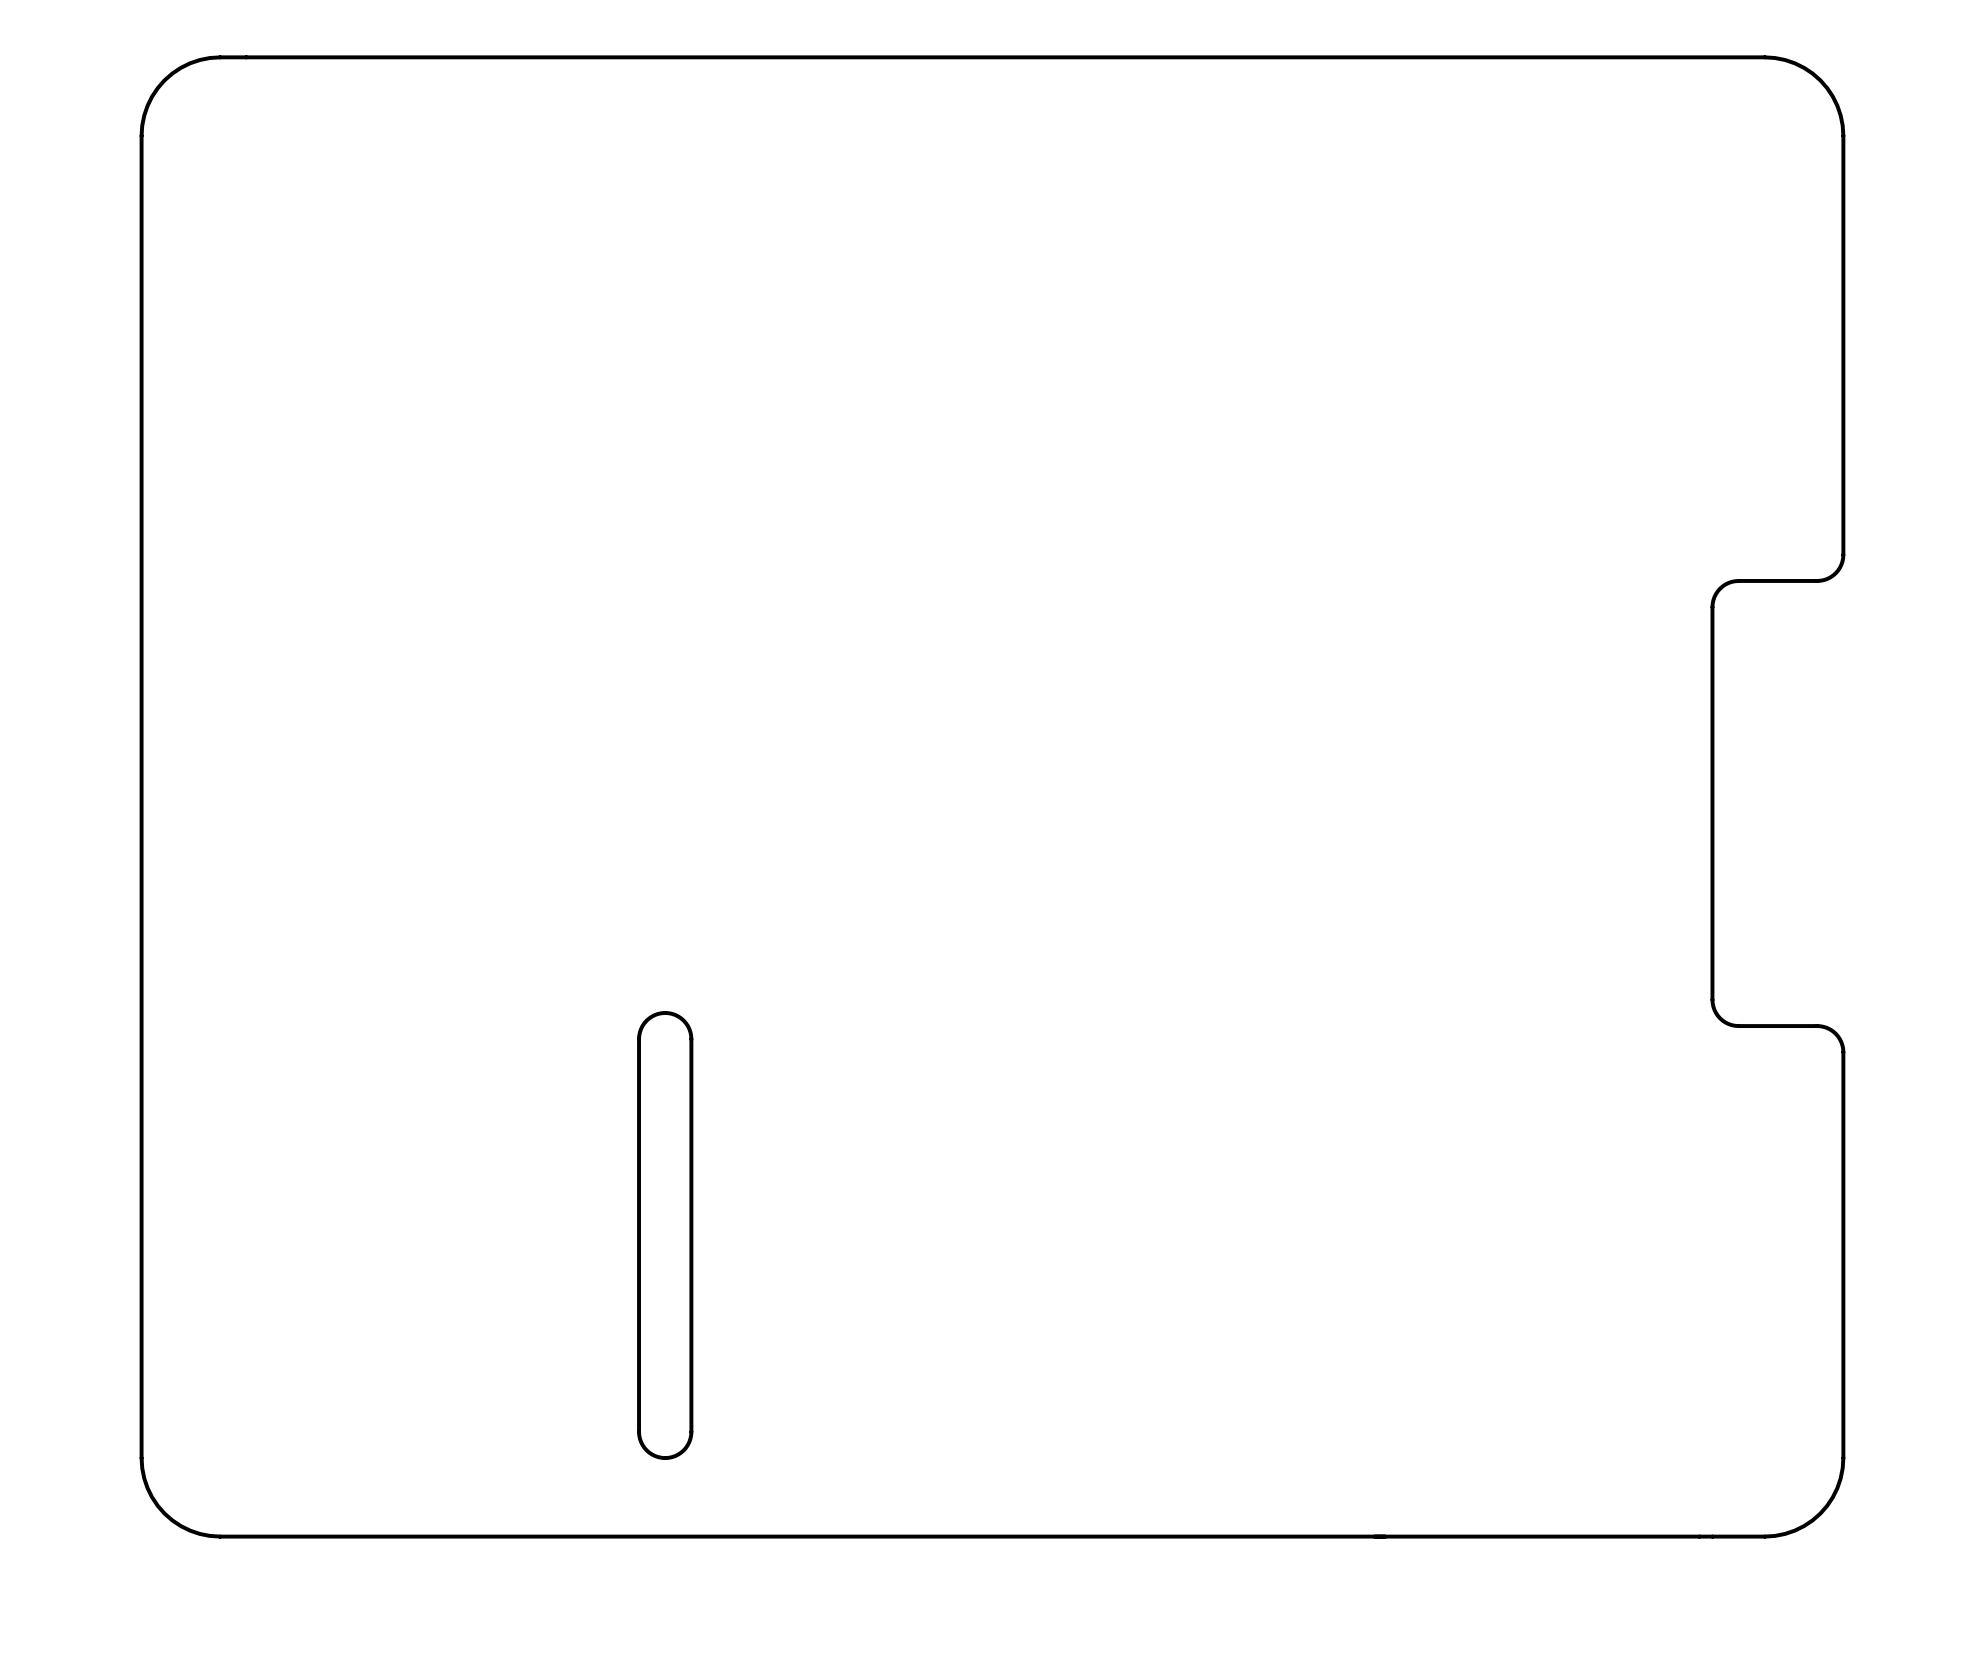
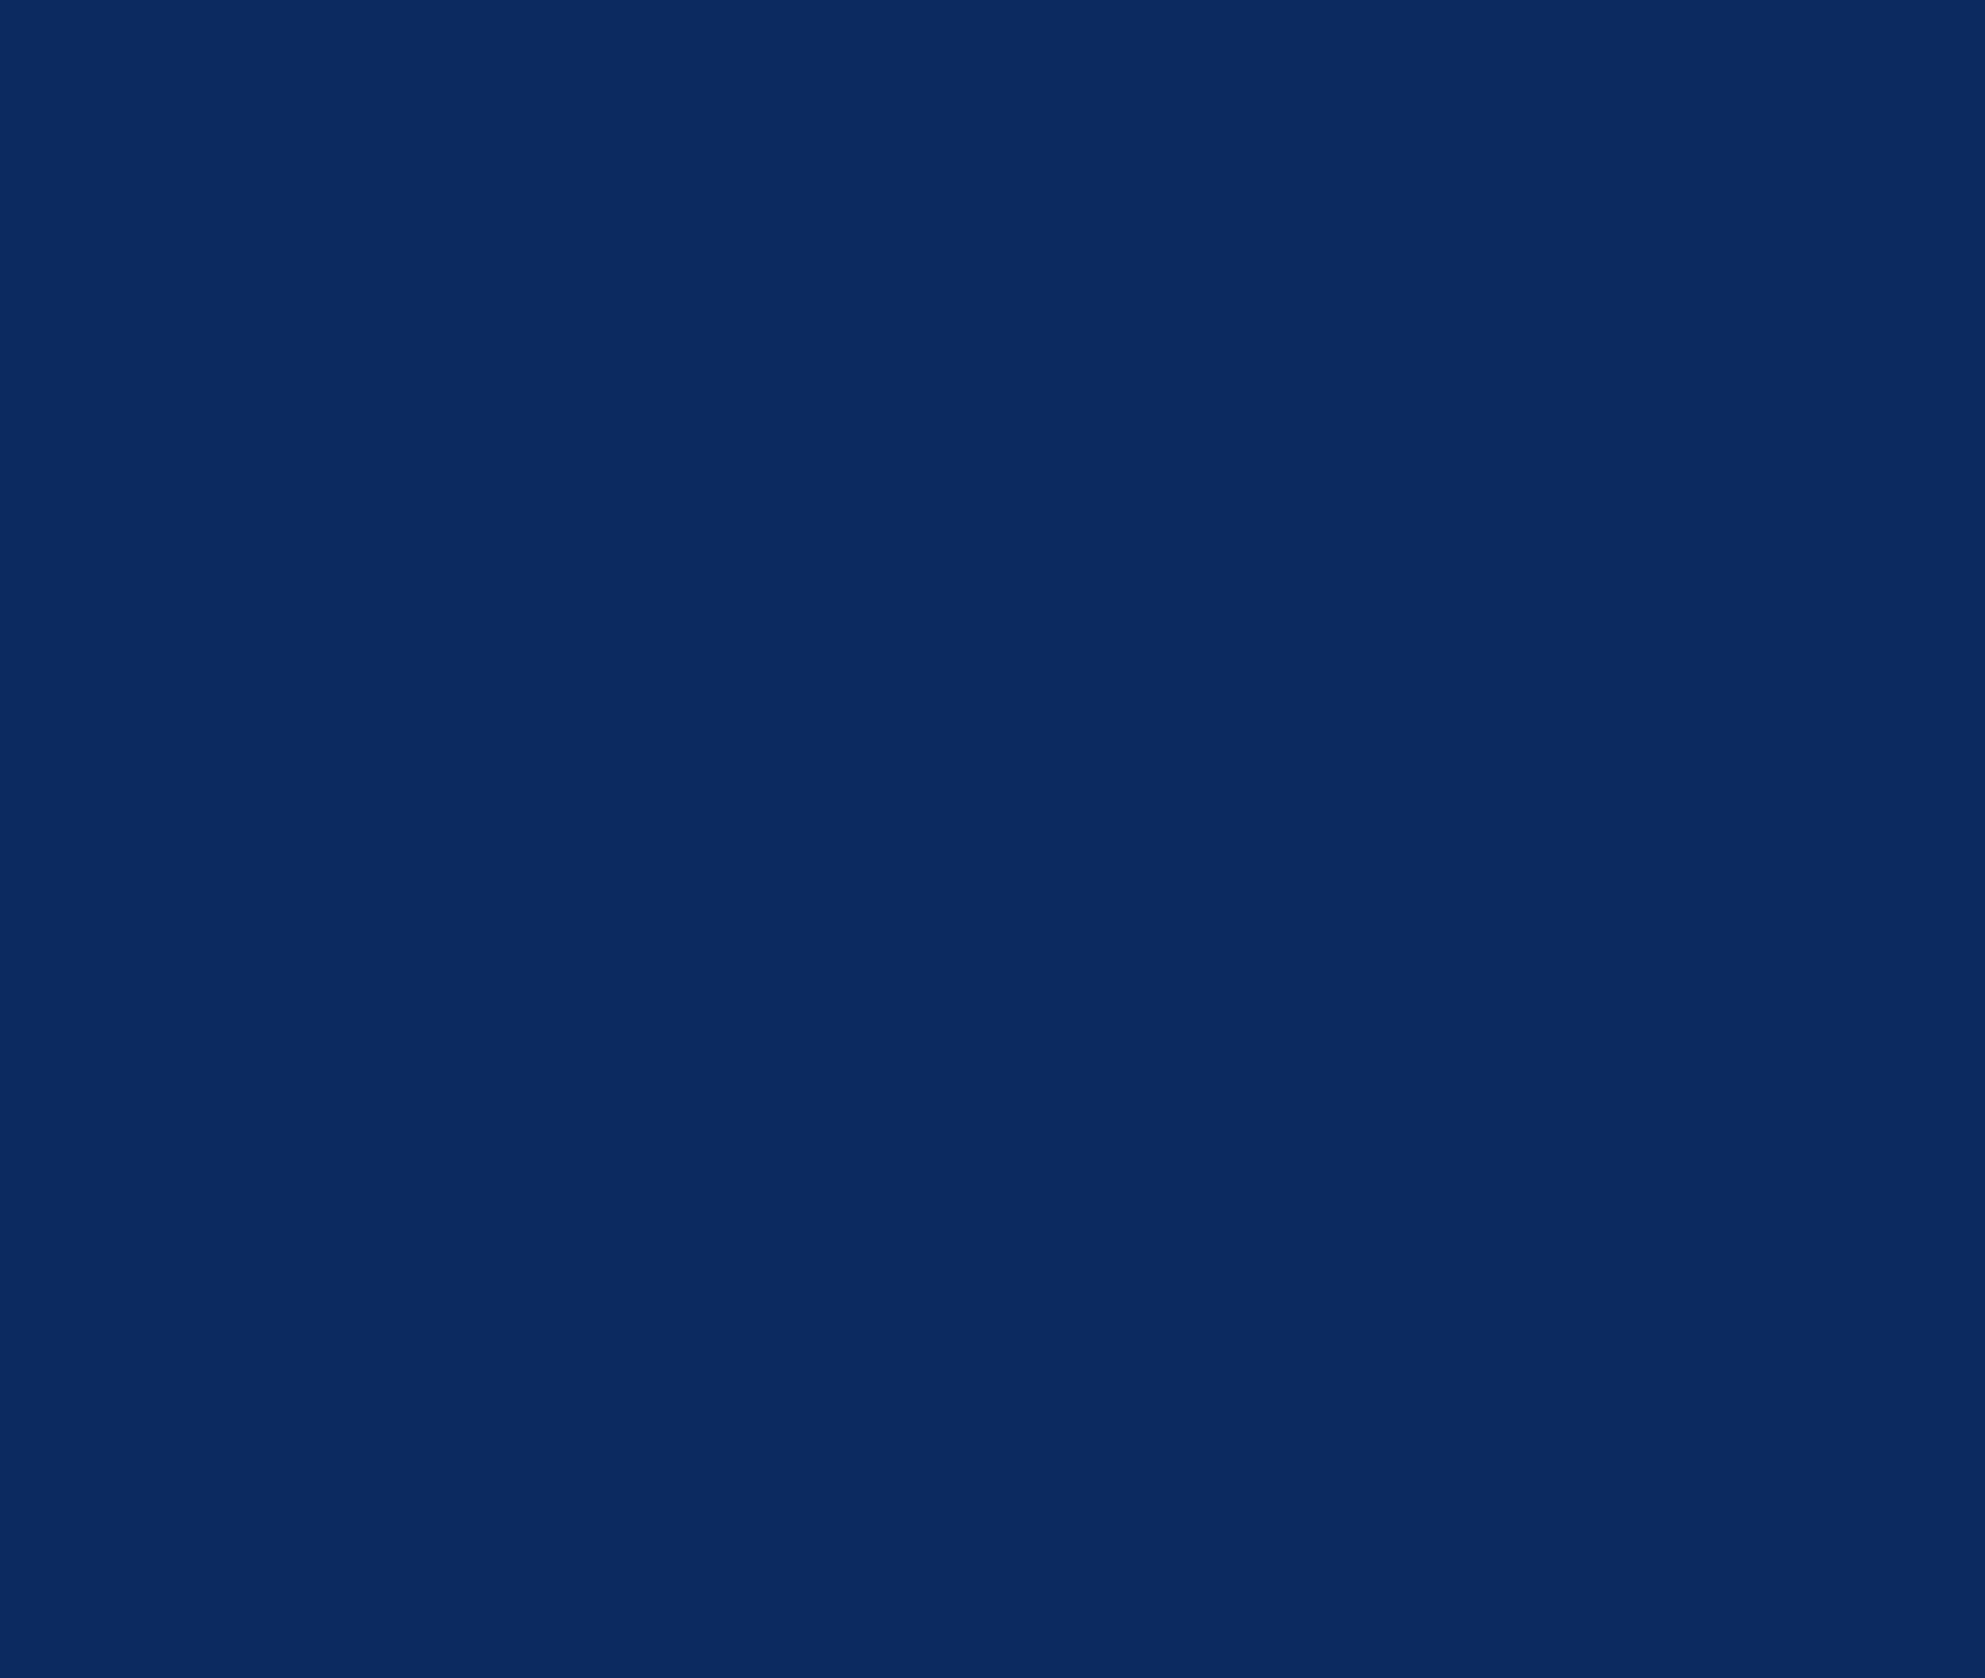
board edge: (1764, 57) (220, 57) (190, 63) (164, 80) (147, 105) (141, 135) (141, 1458) (147, 1488) (164, 1513) (190, 1530) (220, 1536) (1764, 1536) (1794, 1530) (1820, 1513) (1837, 1488) (1843, 1458) (1842, 1045) (1835, 1033) (1820, 1026) (1738, 1026) (1728, 1024) (1717, 1015) (1712, 999) (1713, 600) (1720, 588) (1735, 581) (1817, 580) (1827, 578) (1837, 570) (1843, 554) (1842, 125) (1837, 105) (1820, 80) (1794, 63) (1764, 57) -> none
board edge: (665, 1012) (655, 1014) (646, 1020) (641, 1029) (639, 1039) (639, 1431) (641, 1441) (646, 1450) (655, 1456) (665, 1458) (675, 1456) (683, 1450) (689, 1441) (691, 1431) (691, 1039) (689, 1029) (683, 1020) (675, 1014) (665, 1012) -> none

